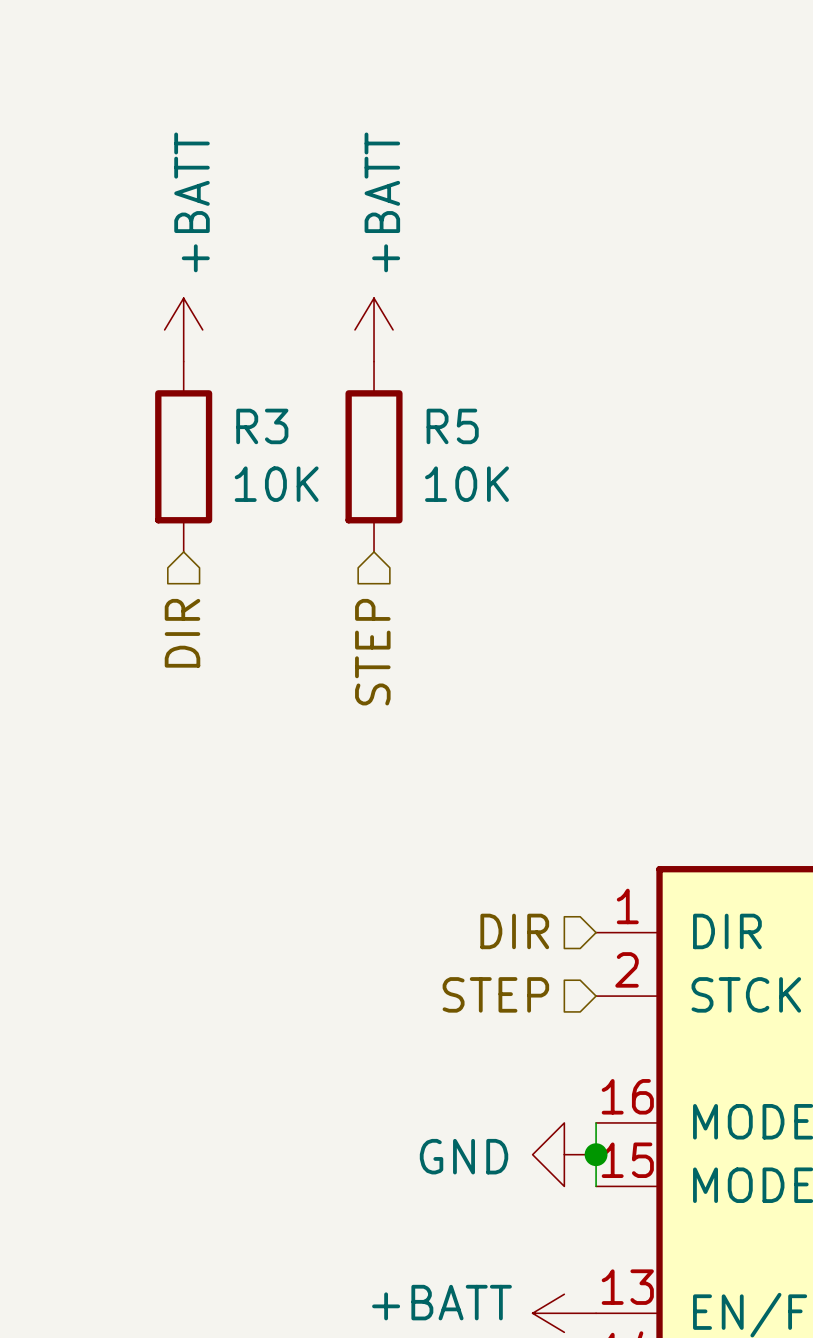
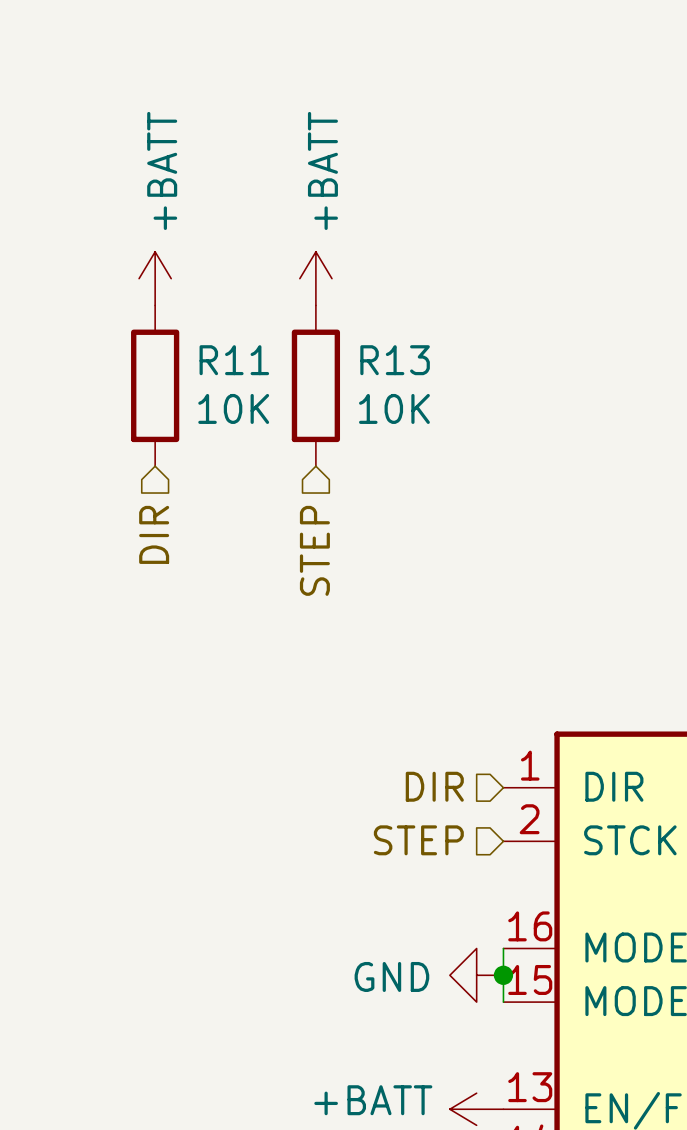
R3 name: R3 (262, 426) -> R11 (234, 360)
R5 name: R5 (452, 426) -> R13 (395, 360)

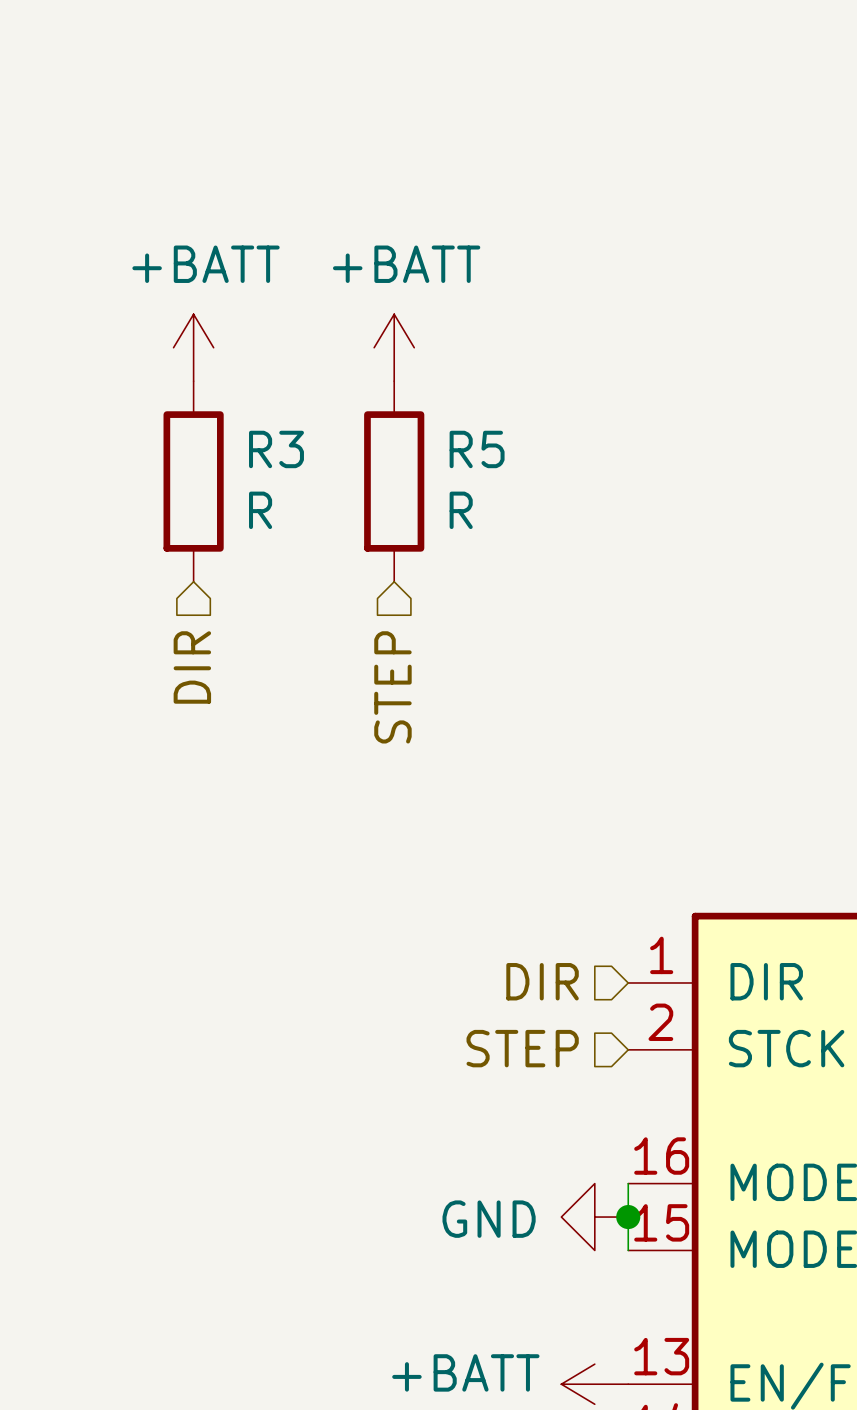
power symbol text rotation: 0° (162, 170) -> 90° clockwise (206, 264)
power symbol text rotation: 0° (322, 170) -> 90° clockwise (406, 264)
R11 name: R11 (234, 360) -> R3 (276, 449)
R13 name: R13 (395, 360) -> R5 (477, 449)
R11 value: 10K (233, 408) -> R (260, 510)
R13 value: 10K (394, 408) -> R (461, 510)

